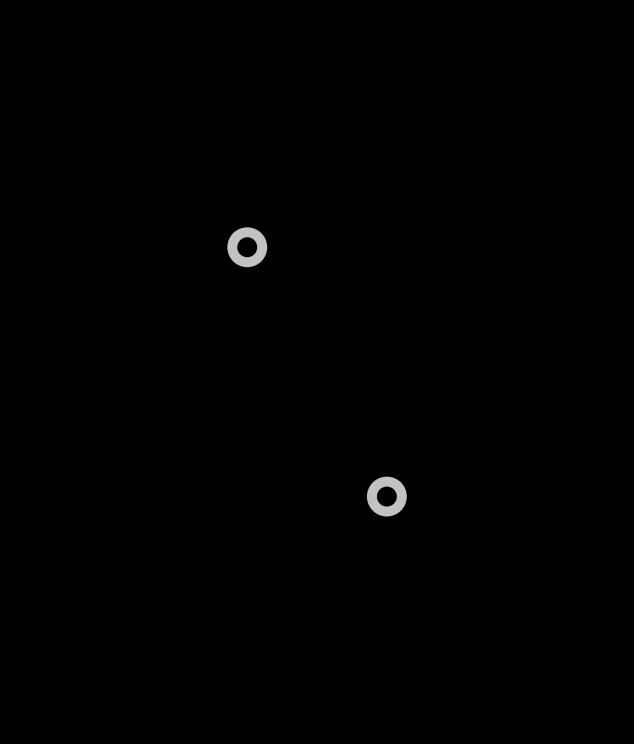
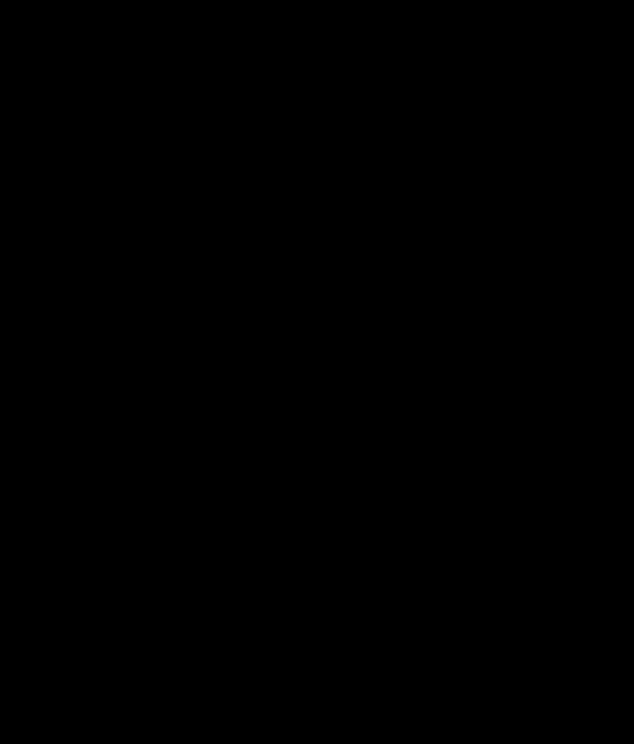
via: (247, 247) -> none
via: (386, 496) -> none

